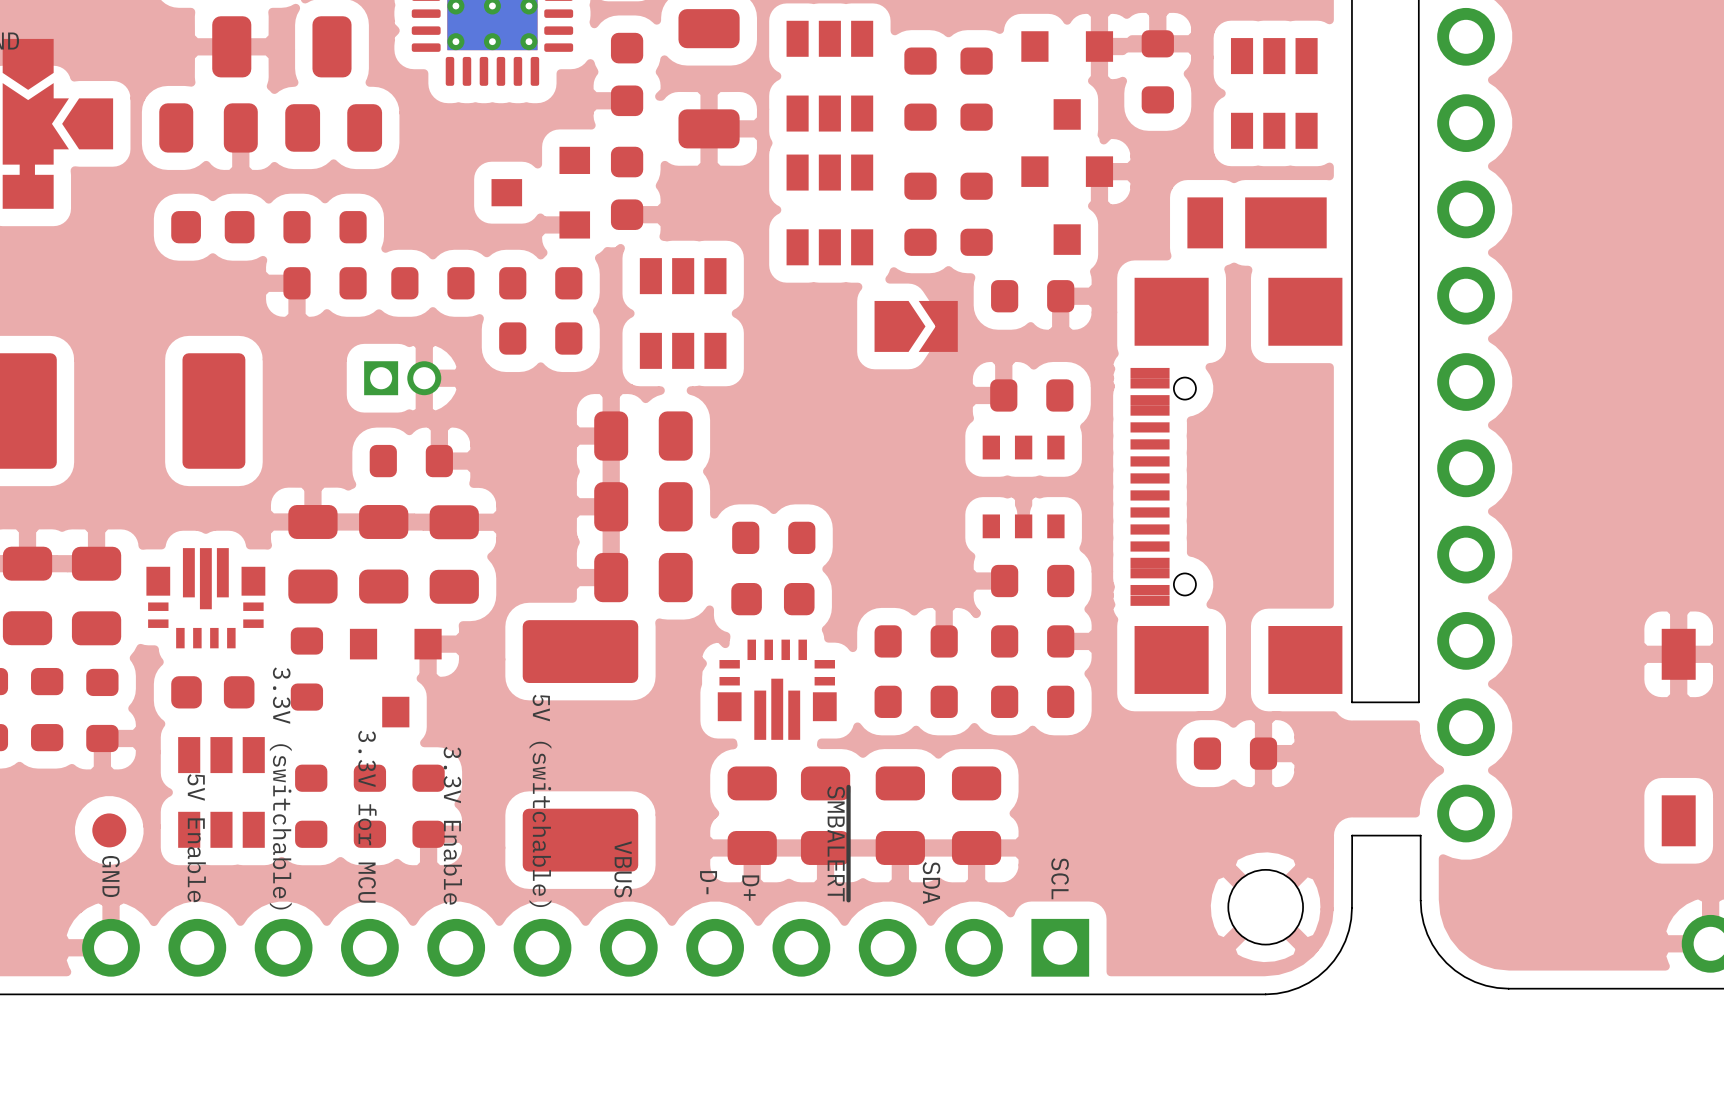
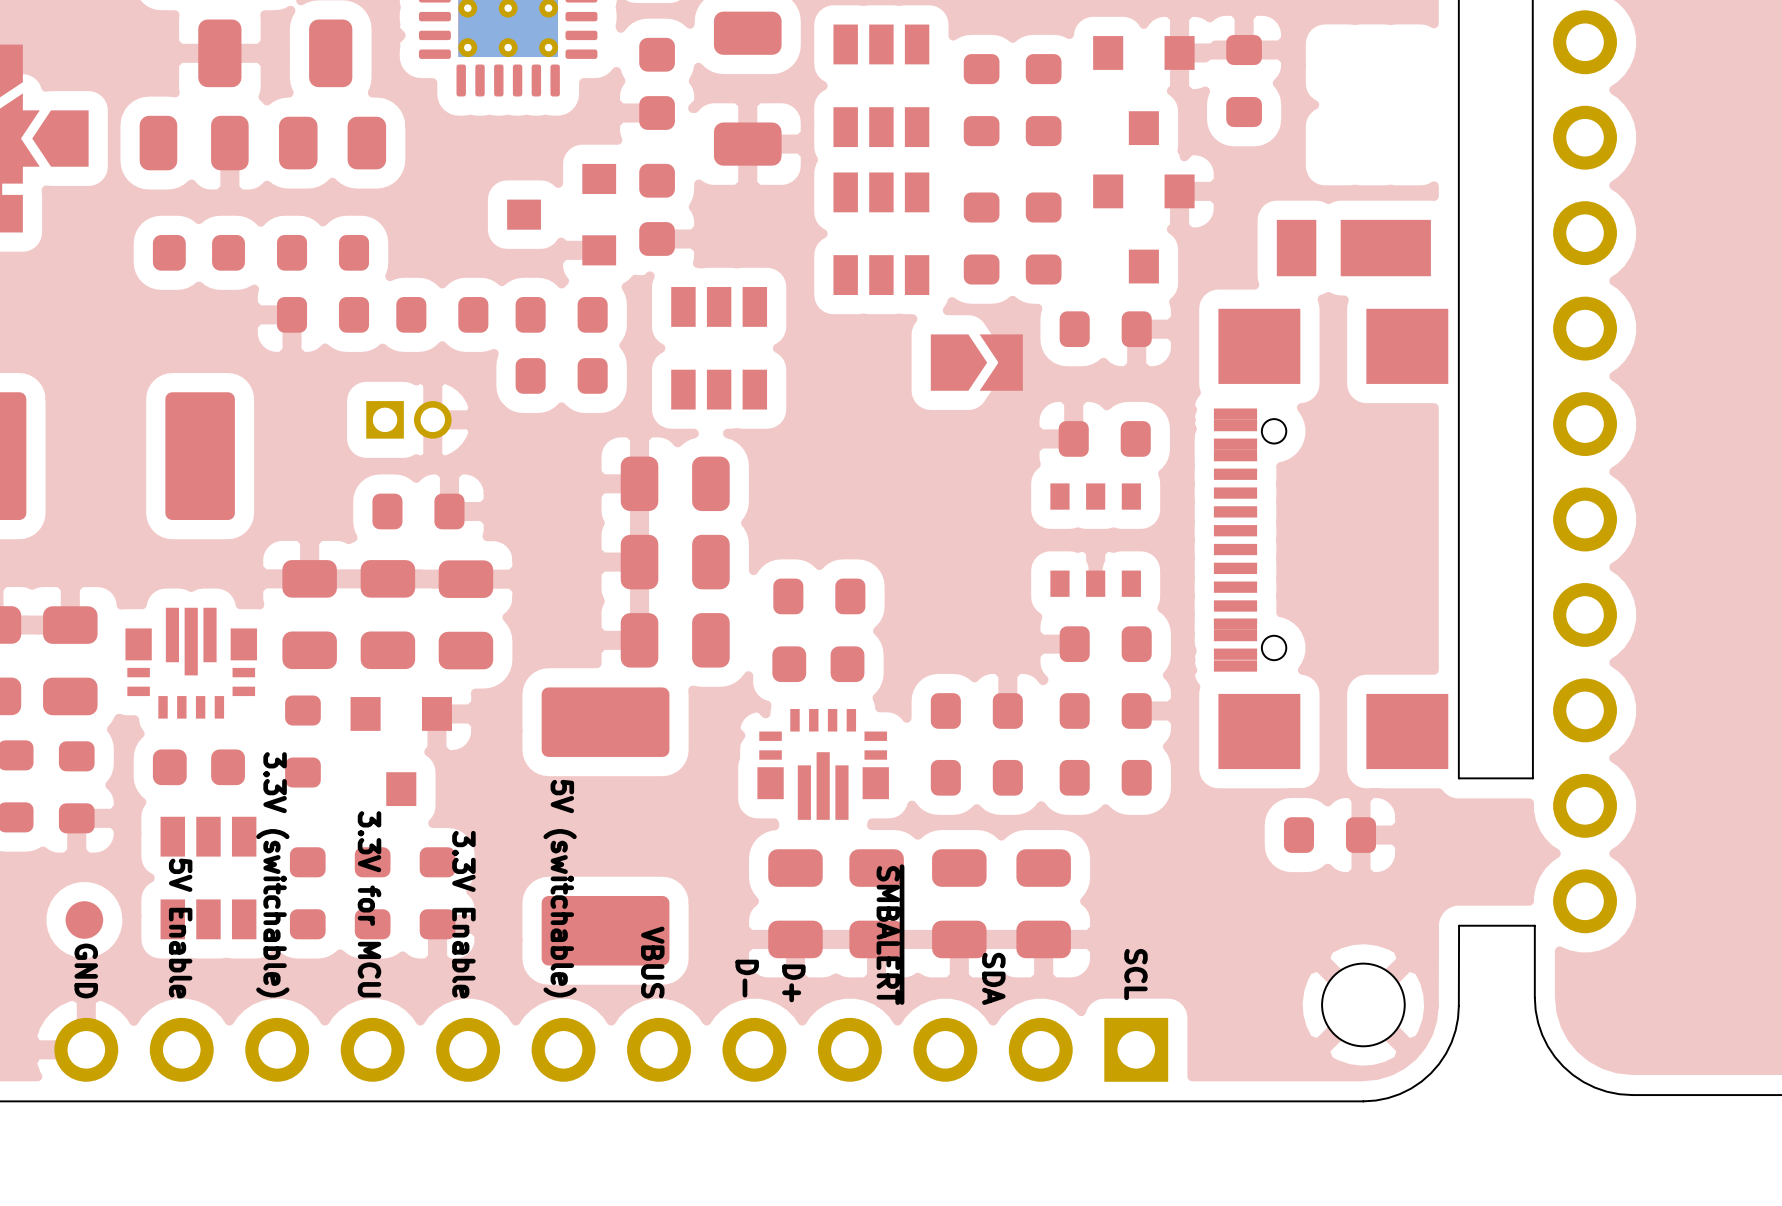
part: (1274, 93) -> none

